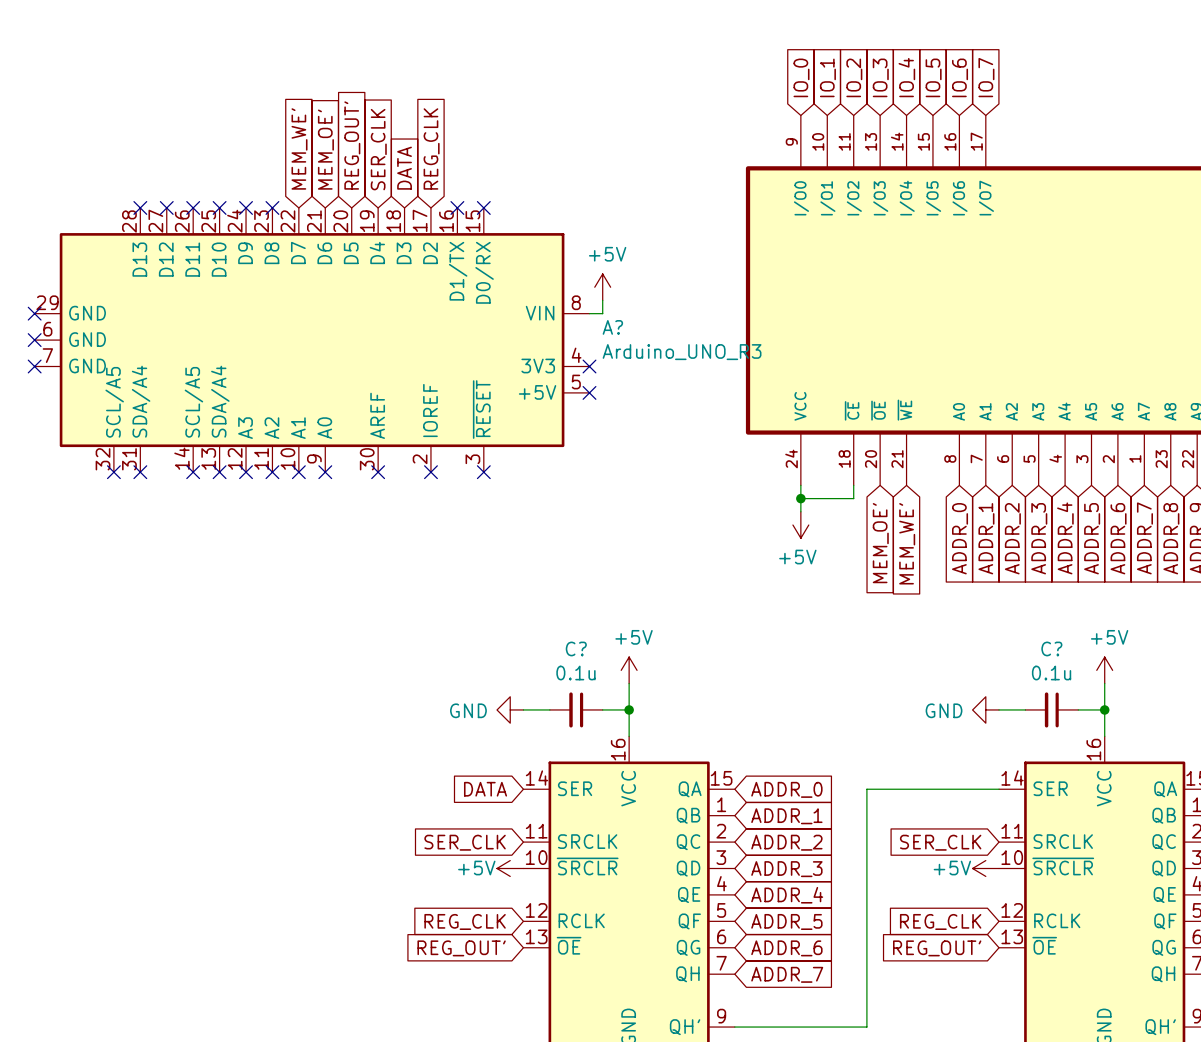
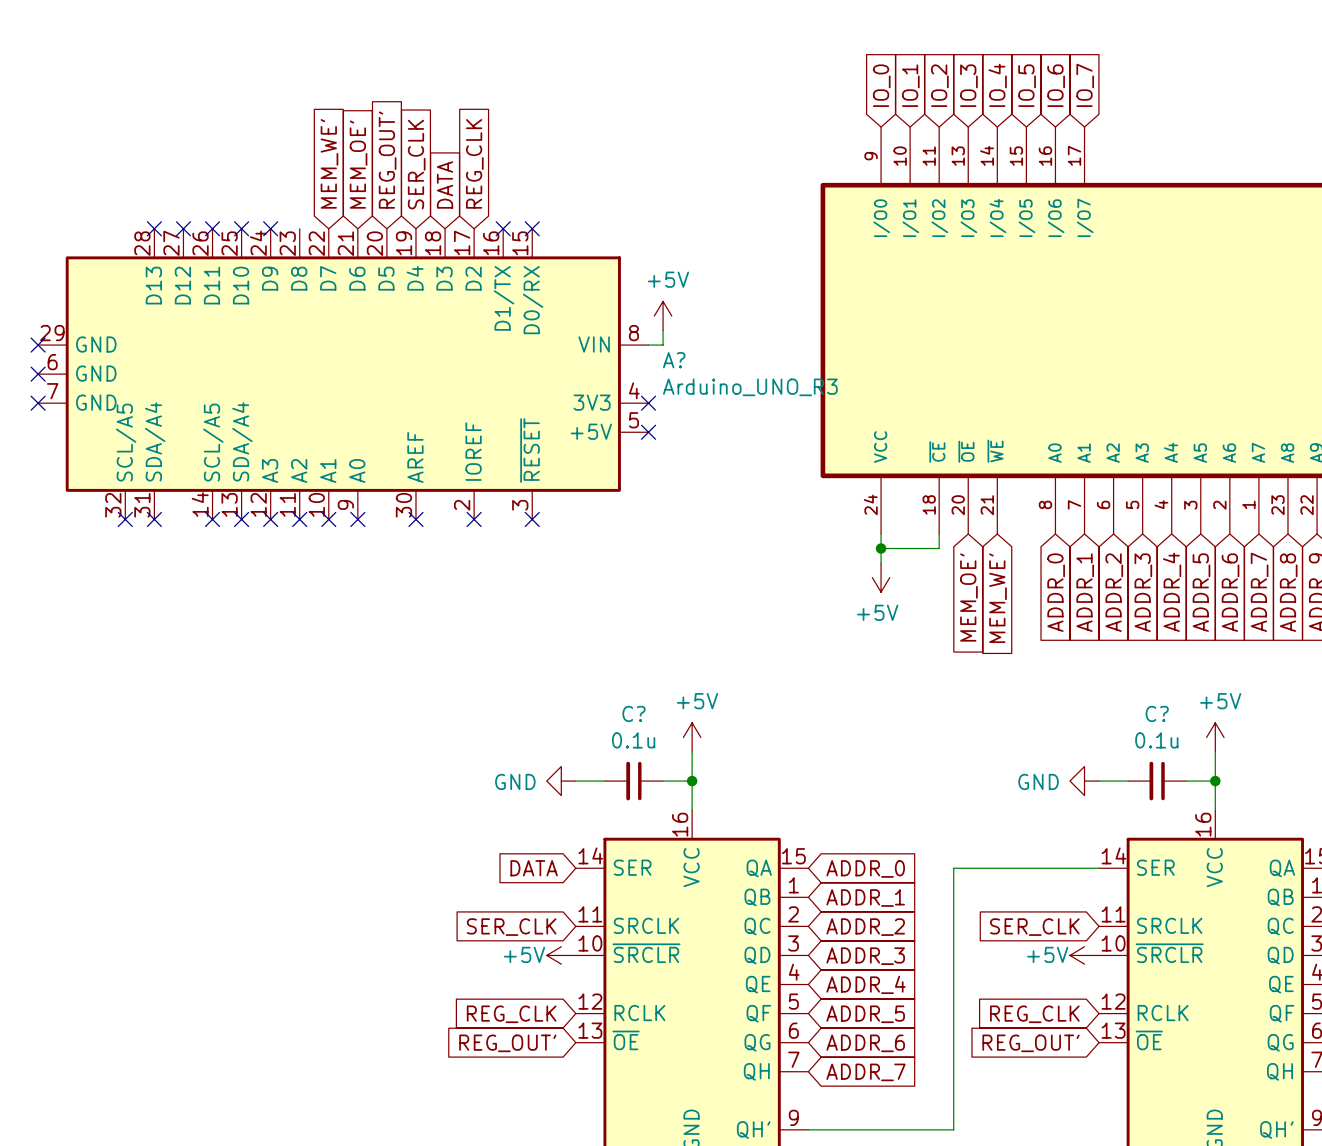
no-connect mark: (272, 207) -> none

